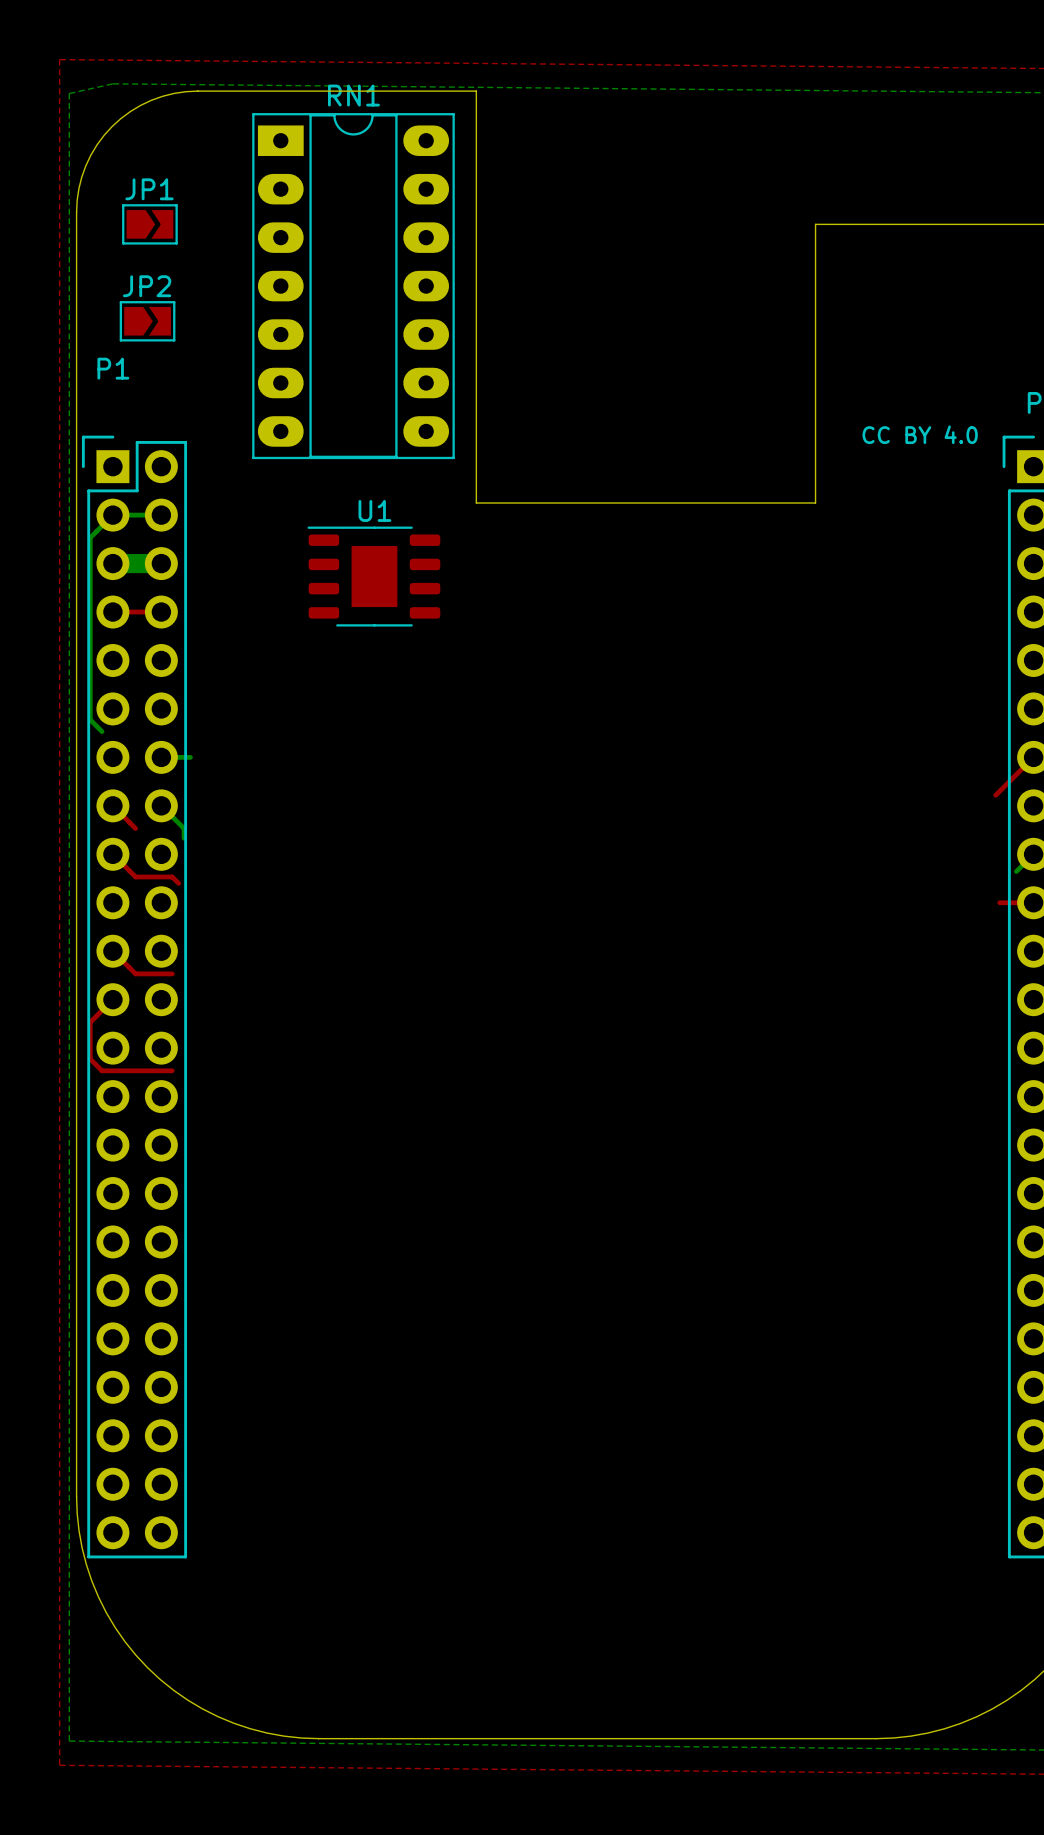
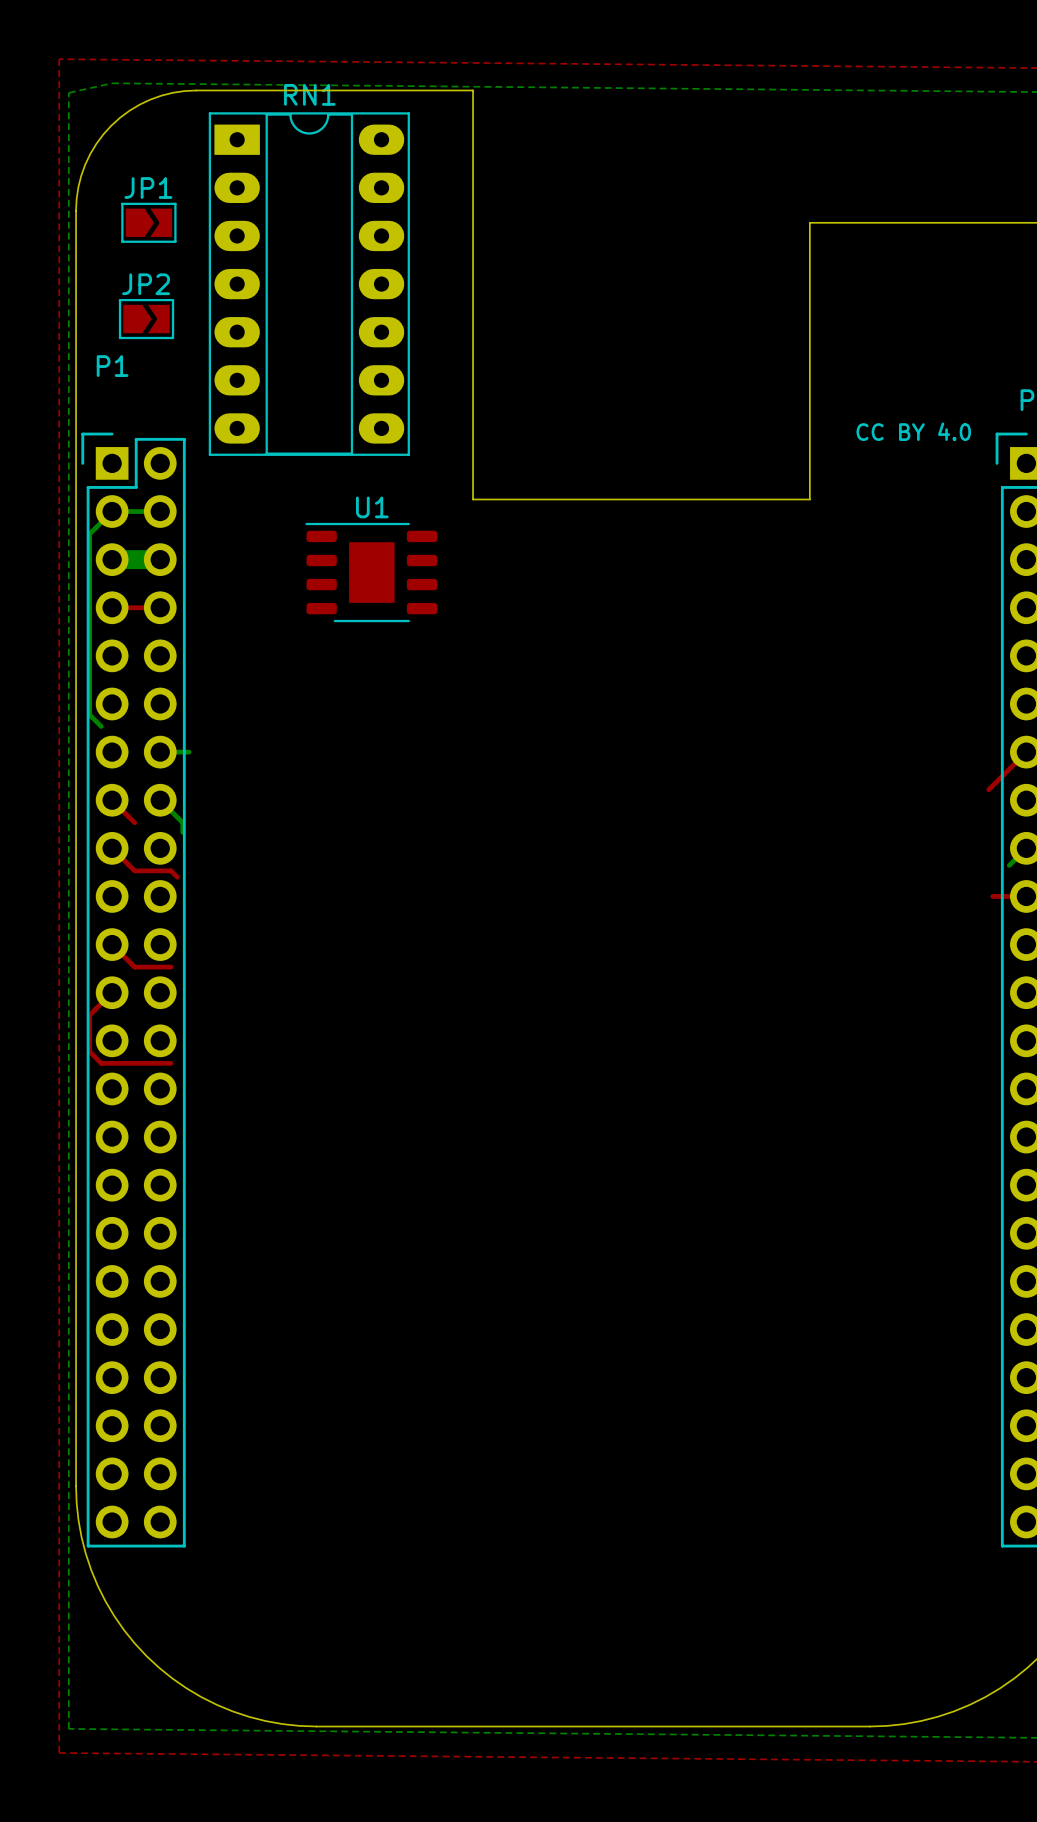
RN1 position: (353, 286) -> (309, 284)

